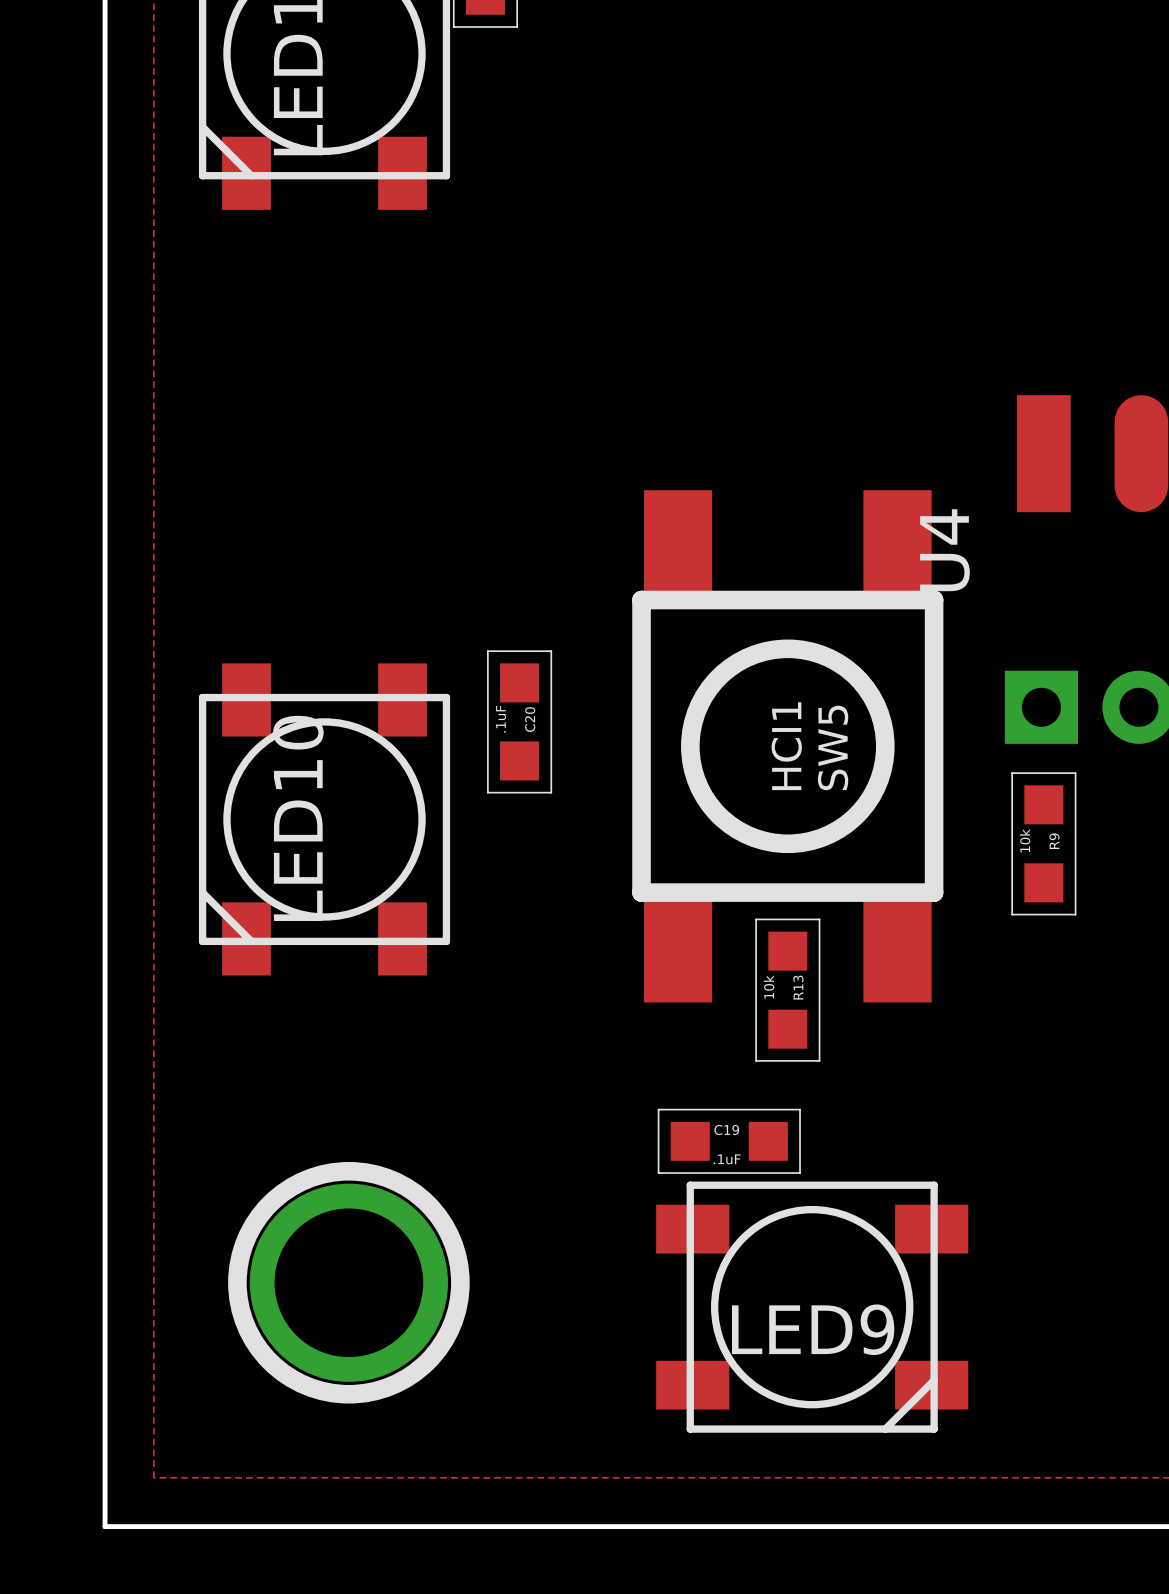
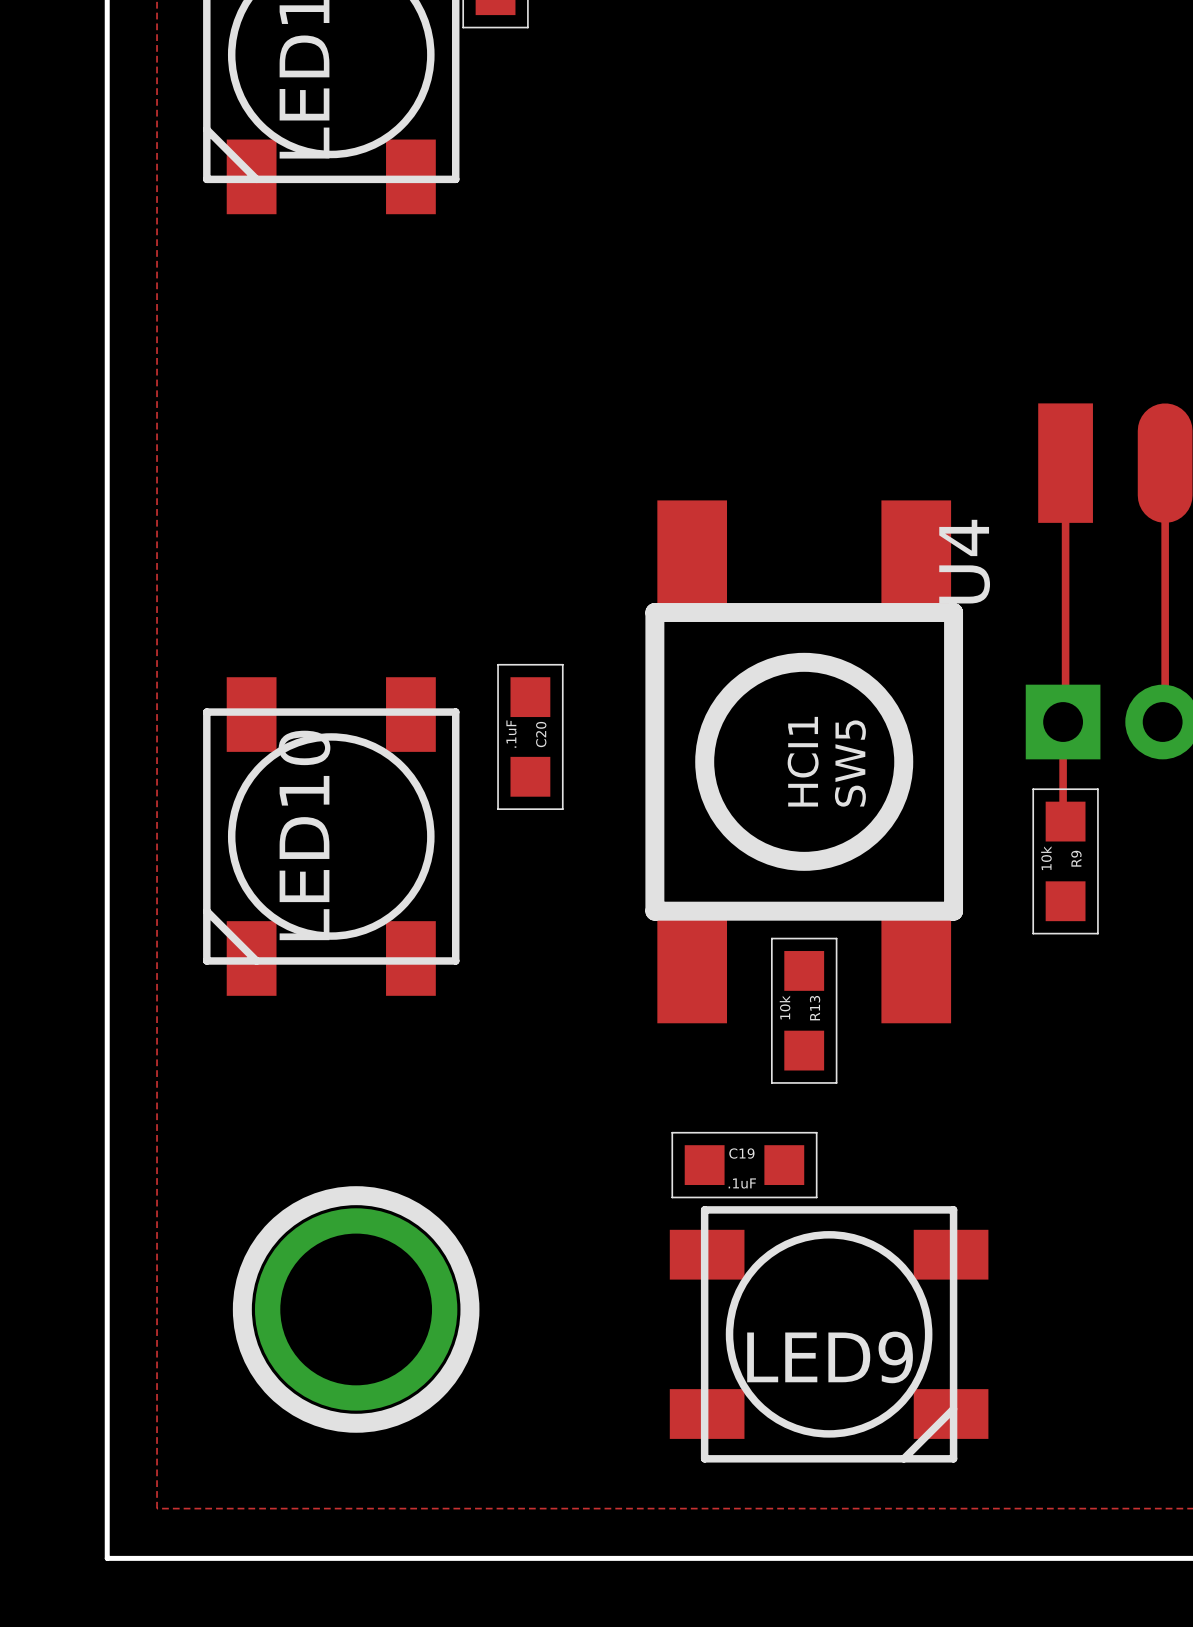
track: none -> (1065, 463) (1065, 719) (1063, 722) (1063, 819) (1065, 821)
track: none -> (1165, 463) (1165, 719) (1162, 722)

